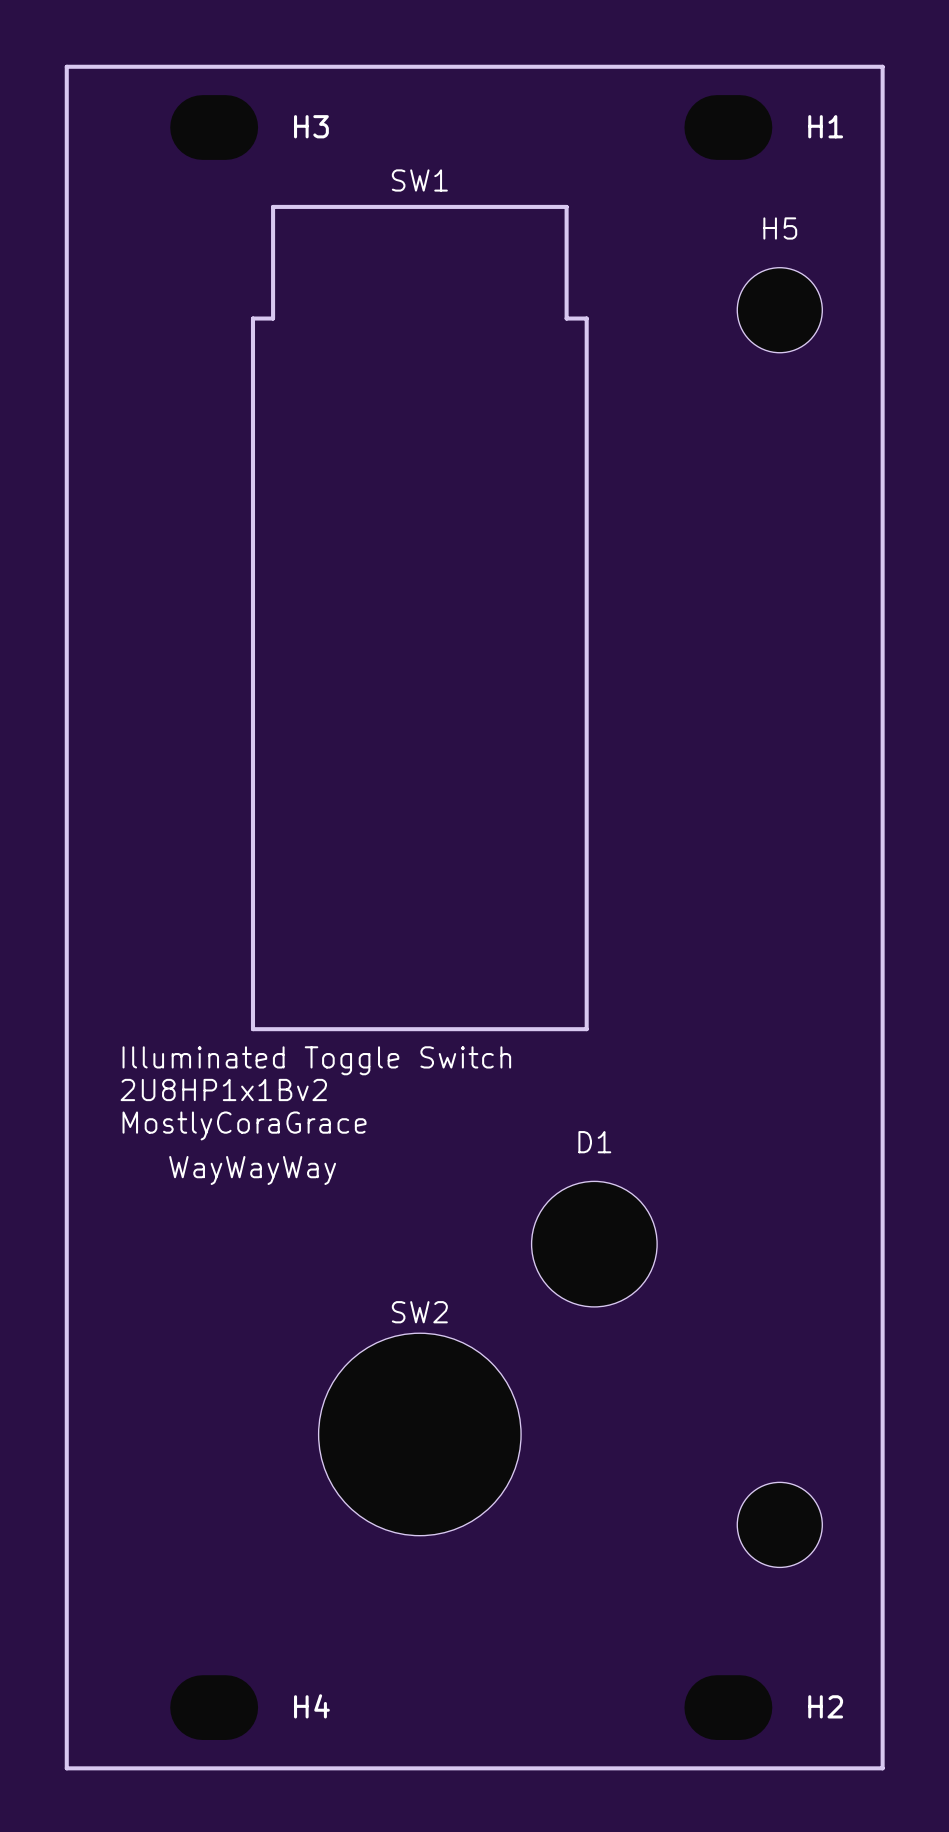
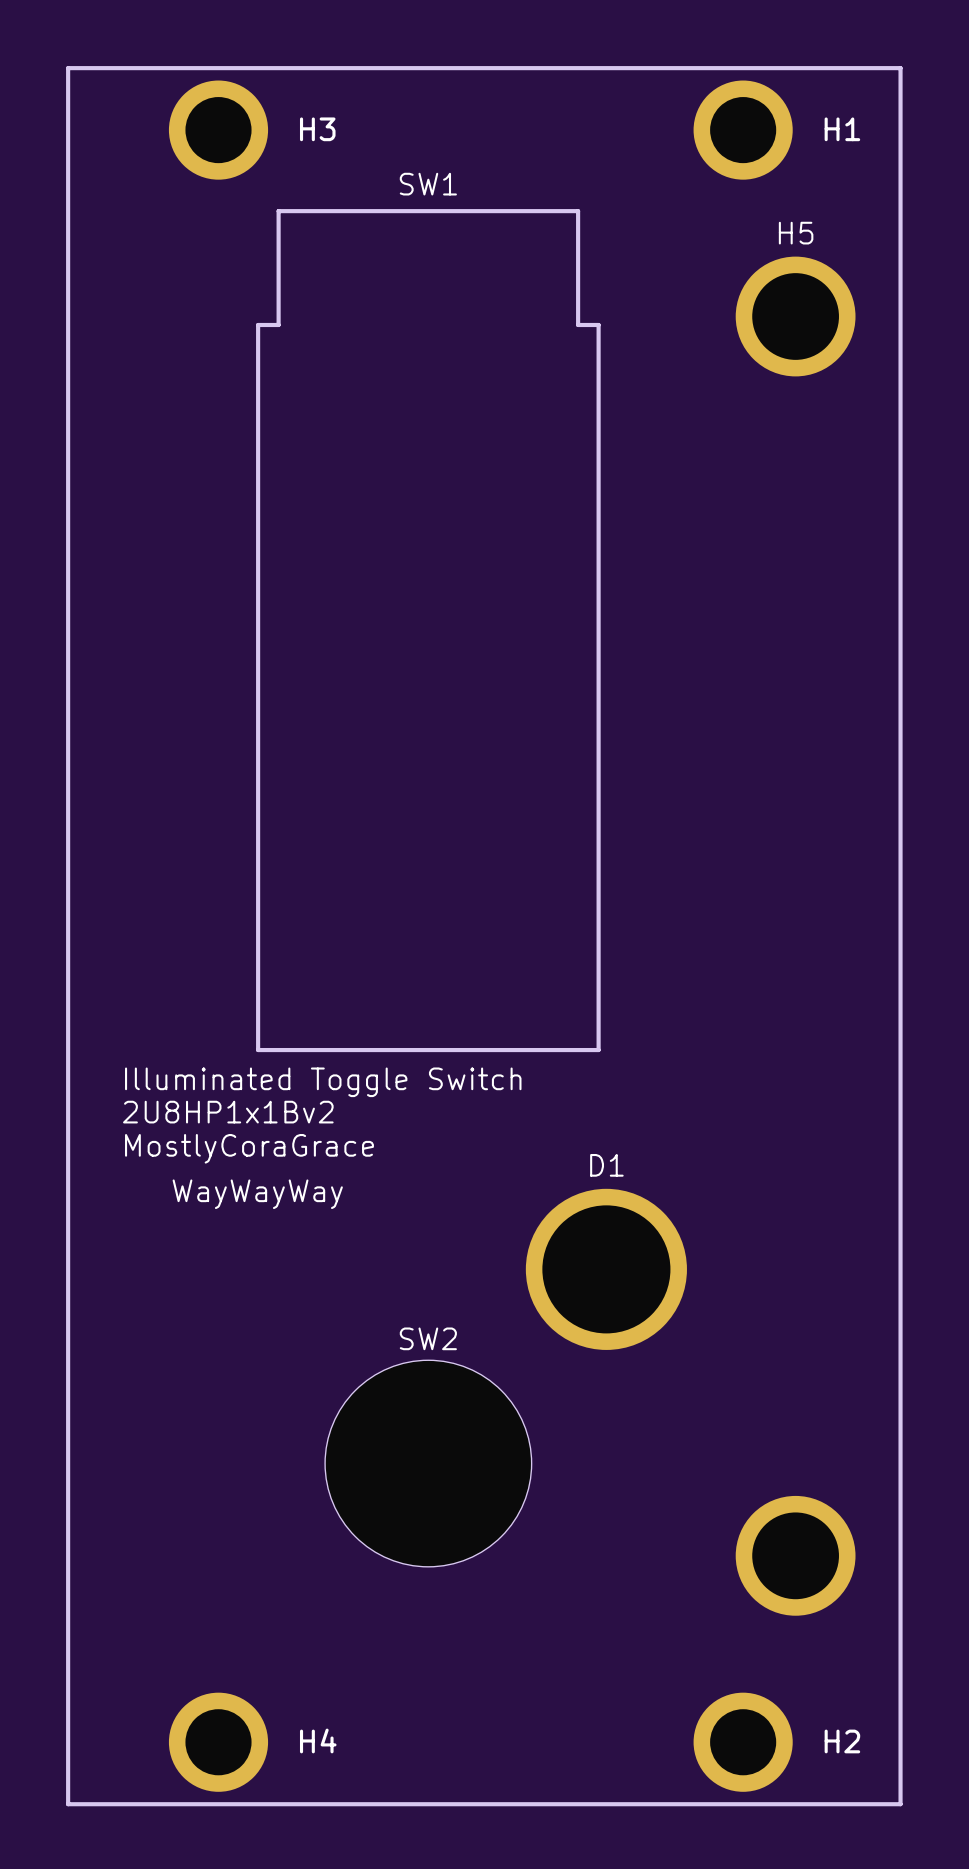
H3 footprint: [170, 95, 259, 160] -> [168, 80, 269, 180]
H1 footprint: [684, 95, 773, 160] -> [693, 80, 793, 180]
H5 footprint: [737, 267, 823, 1568] -> [735, 256, 856, 1616]
D1 footprint: [531, 1181, 658, 1307] -> [525, 1188, 687, 1350]
H4 footprint: [170, 1675, 259, 1740] -> [168, 1692, 269, 1792]
H2 footprint: [684, 1675, 773, 1740] -> [693, 1692, 793, 1792]

